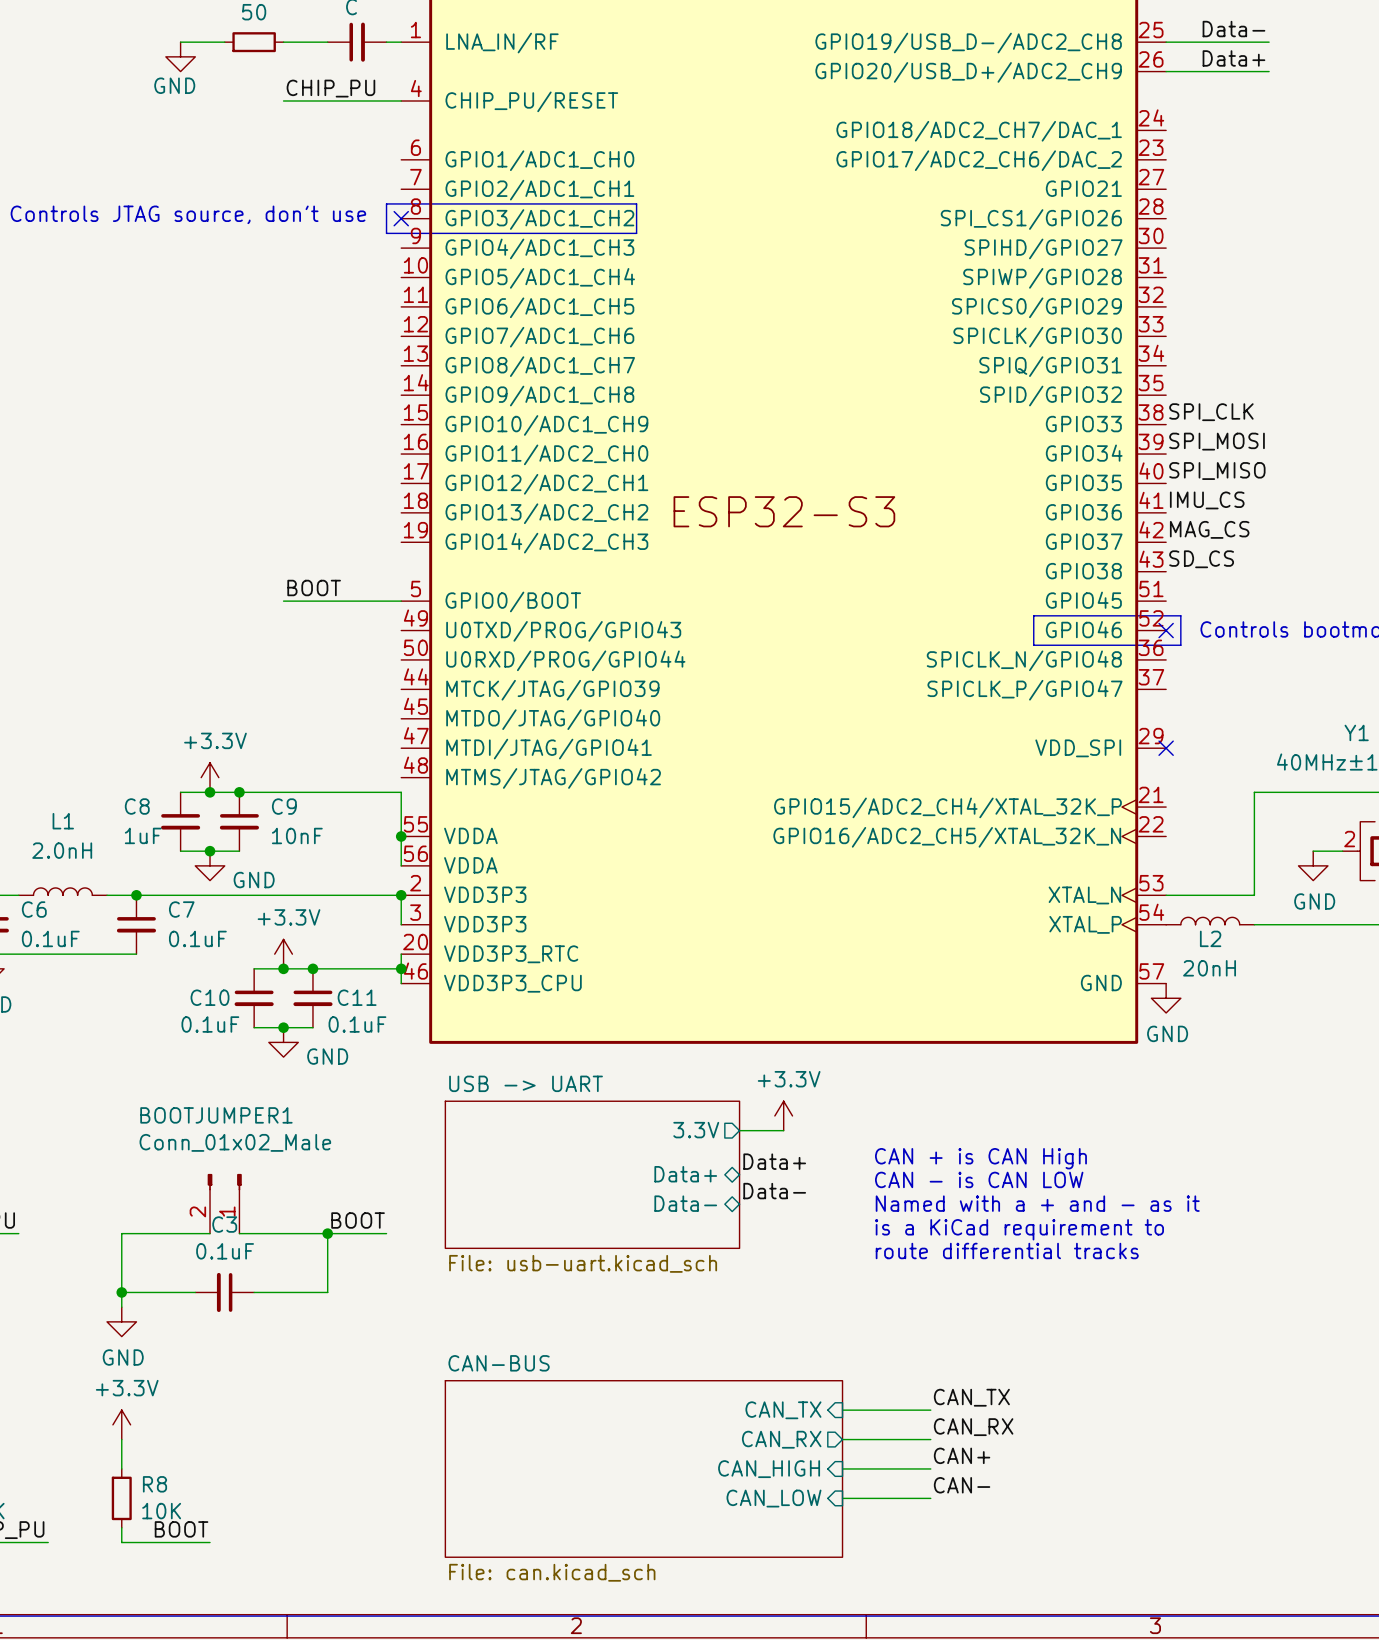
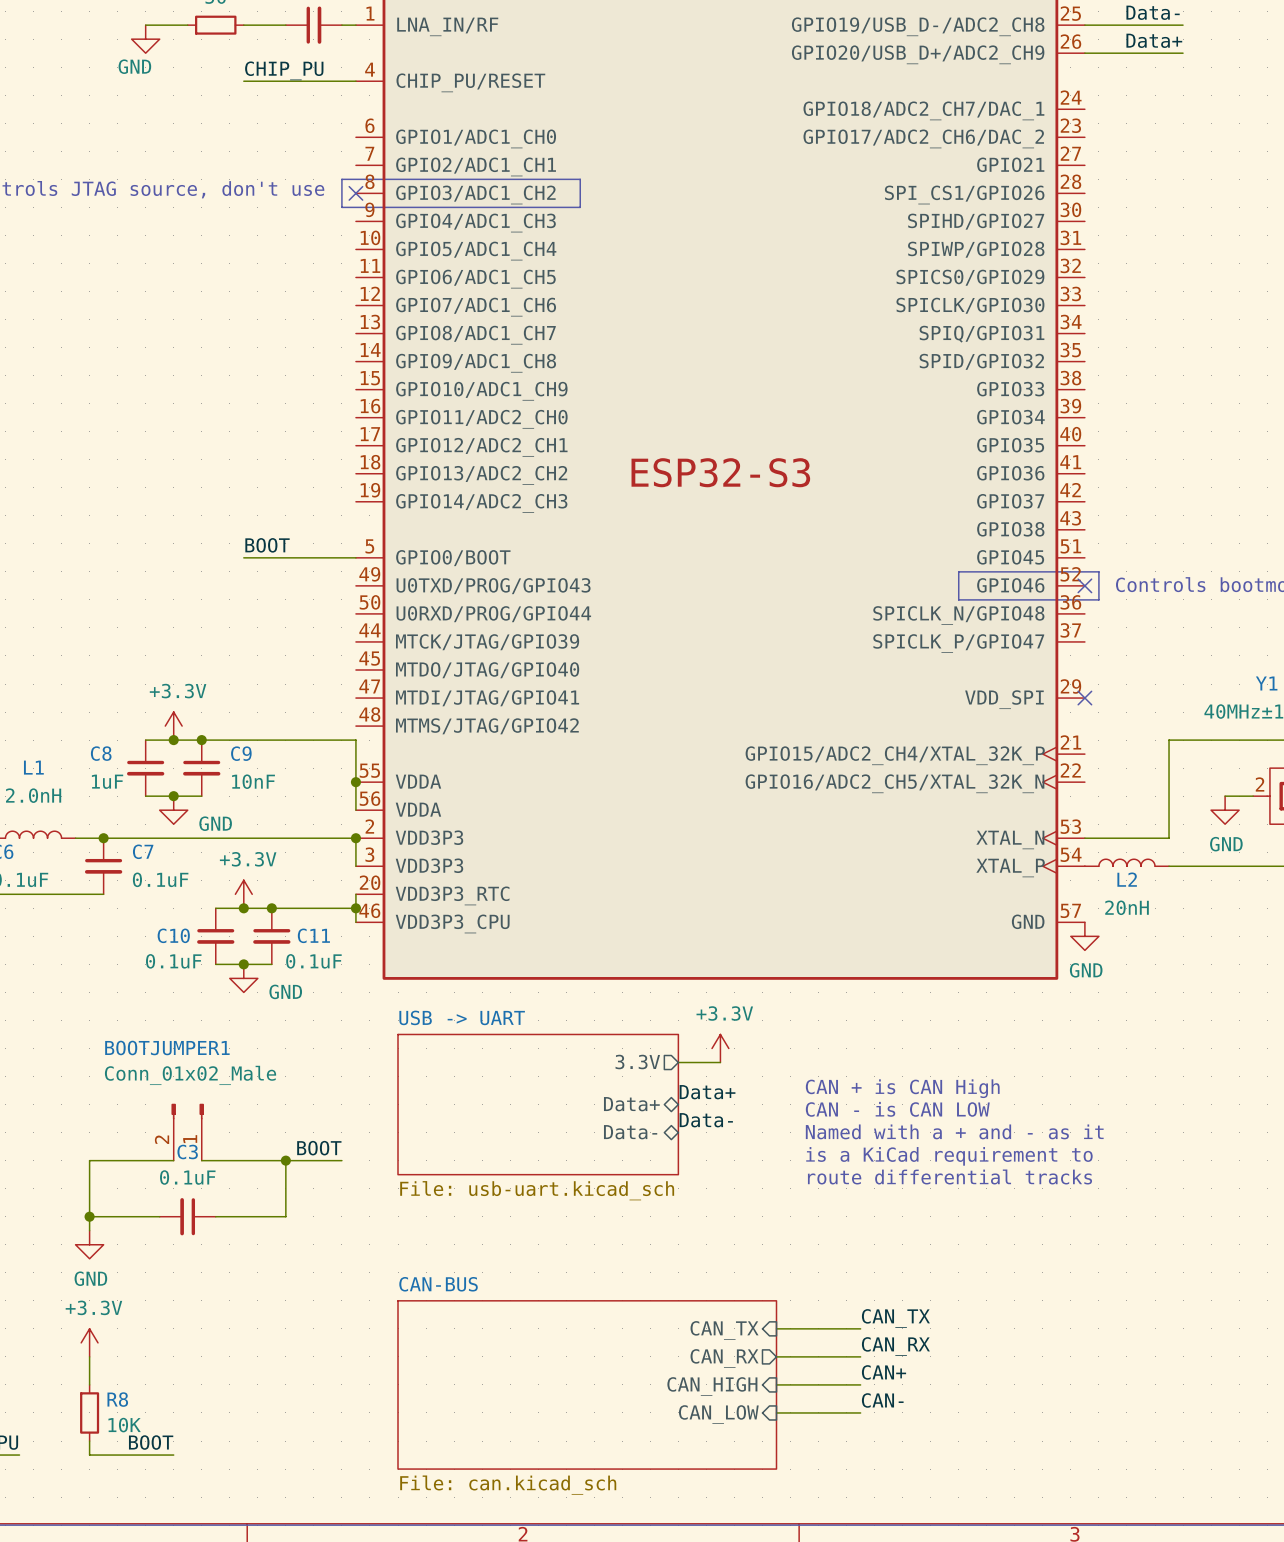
label: SPI_CLK (1211, 412) -> none
label: SPI_MOSI (1217, 441) -> none
label: SPI_MISO (1217, 471) -> none
label: IMU_CS (1207, 500) -> none
label: MAG_CS (1209, 529) -> none
label: SD_CS (1201, 559) -> none

